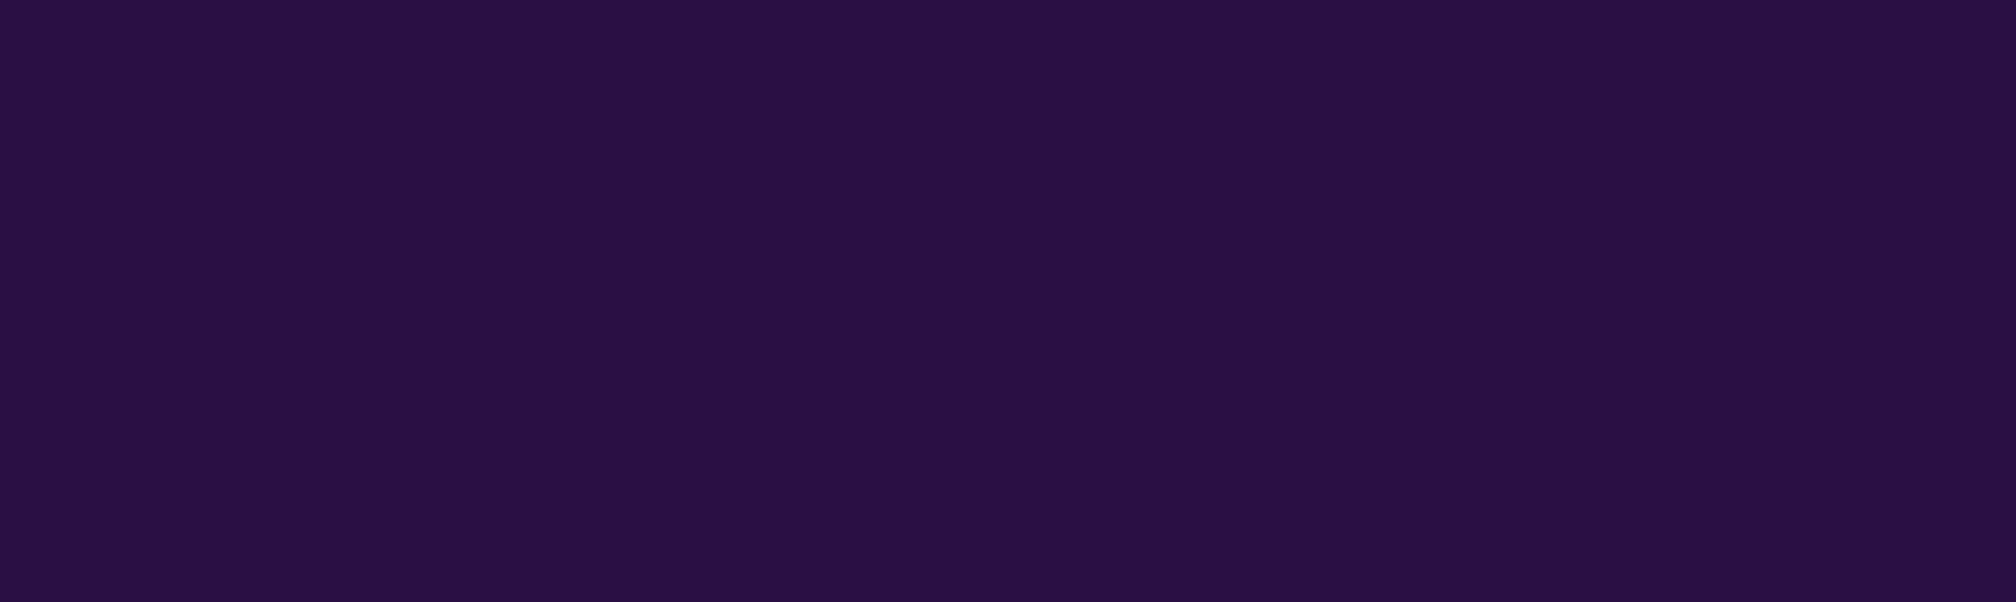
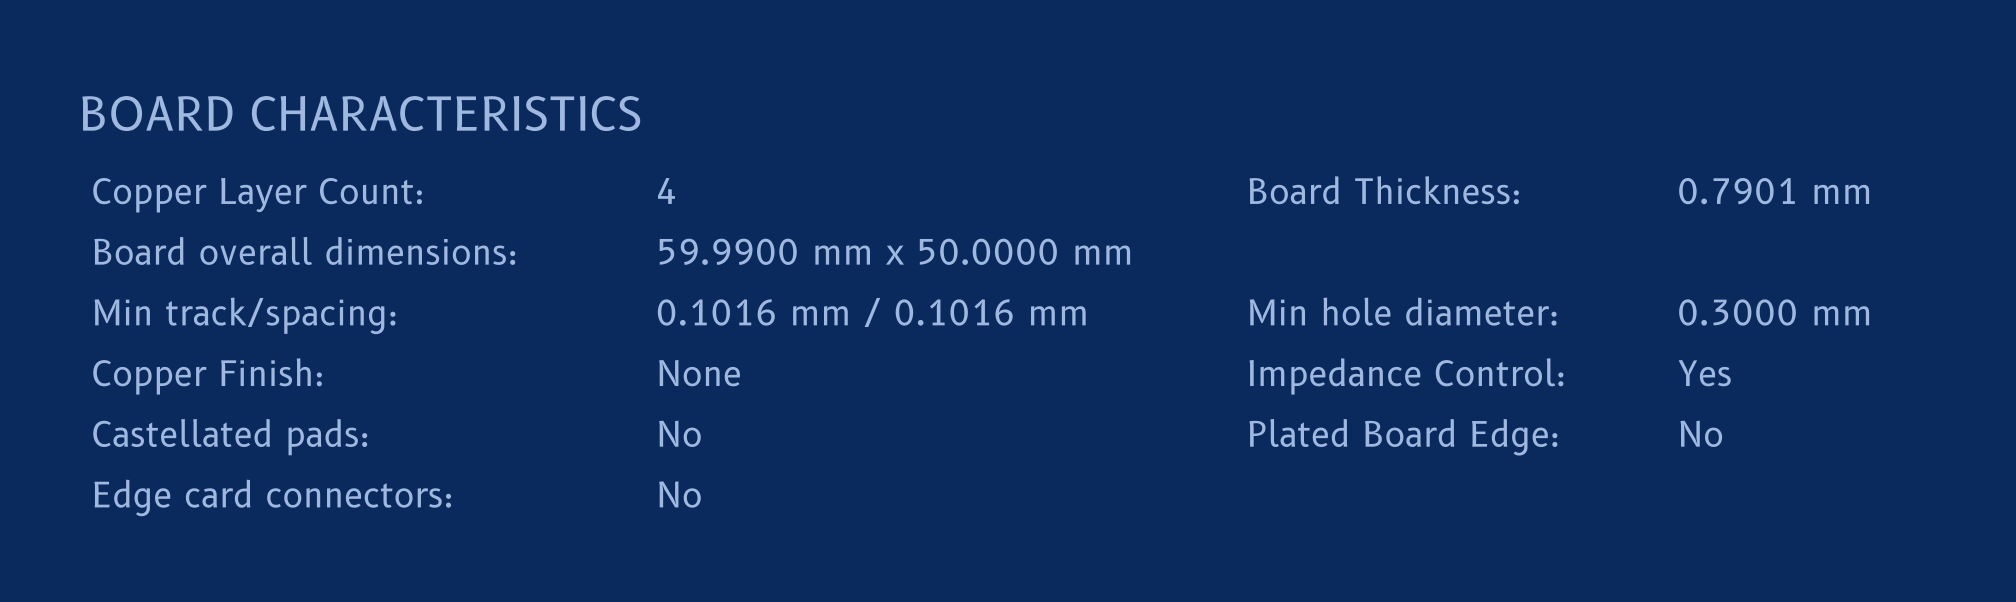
text: none -> BOARD CHARACTERISTICS (361, 113)
text: none -> 4 (666, 190)
text: none -> Board Thickness: (1384, 190)
text: none -> 0.7901 mm (1774, 191)
text: none -> Copper Layer Count: (257, 195)
text: none -> Board overall dimensions: (304, 250)
text: none -> 59.9900 mm x 50.0000 mm (894, 251)
text: none -> 0.1016 mm / 0.1016 mm (871, 312)
text: none -> Min hole diameter: (1403, 311)
text: none -> 0.3000 mm (1774, 312)
text: none -> Min track/spacing: (245, 315)
text: none -> None (699, 373)
text: none -> Yes (1704, 373)
text: none -> Copper Finish: (207, 376)
text: none -> Impedance Control: (1406, 376)
text: none -> No (679, 433)
text: none -> No (1701, 433)
text: none -> Castellated pads: (230, 437)
text: none -> Plated Board Edge: (1403, 437)
text: none -> No (679, 494)
text: none -> Edge card connectors: (272, 497)

